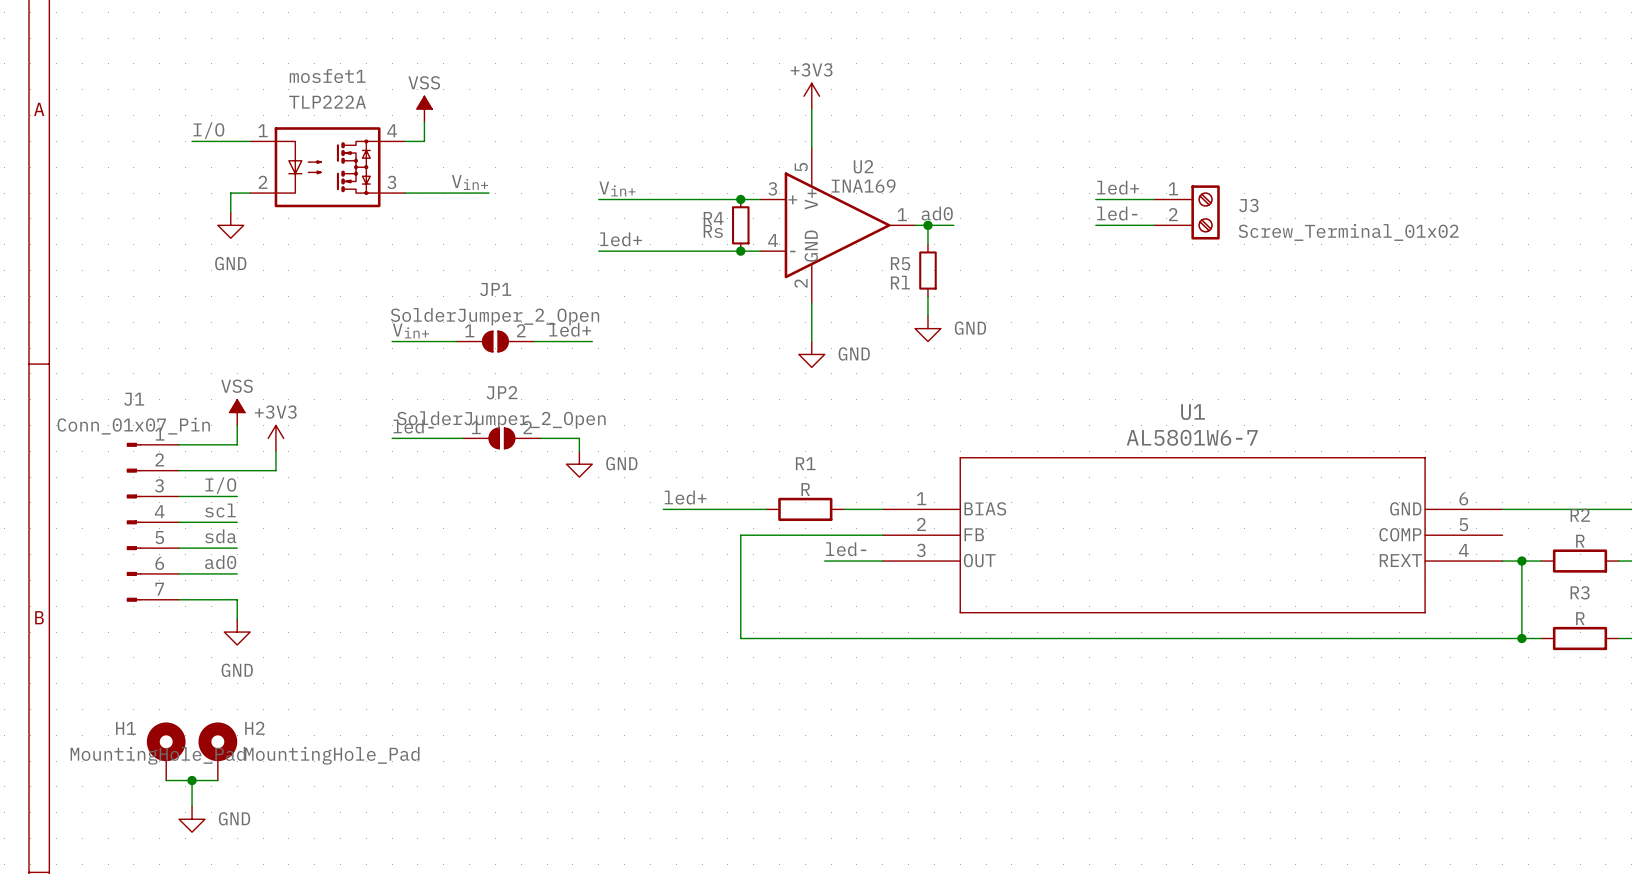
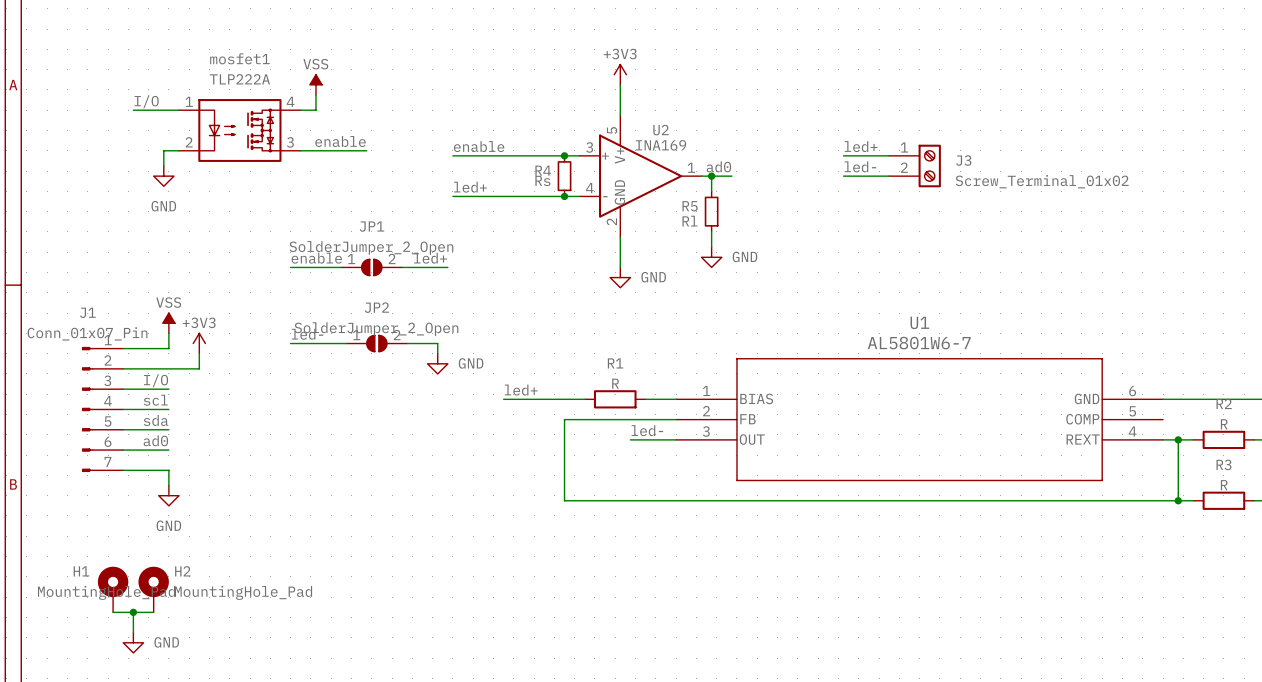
label: Vin+ (470, 182) -> enable (340, 141)
label: Vin+ (617, 188) -> enable (479, 146)
label: Vin+ (410, 330) -> enable (316, 258)

